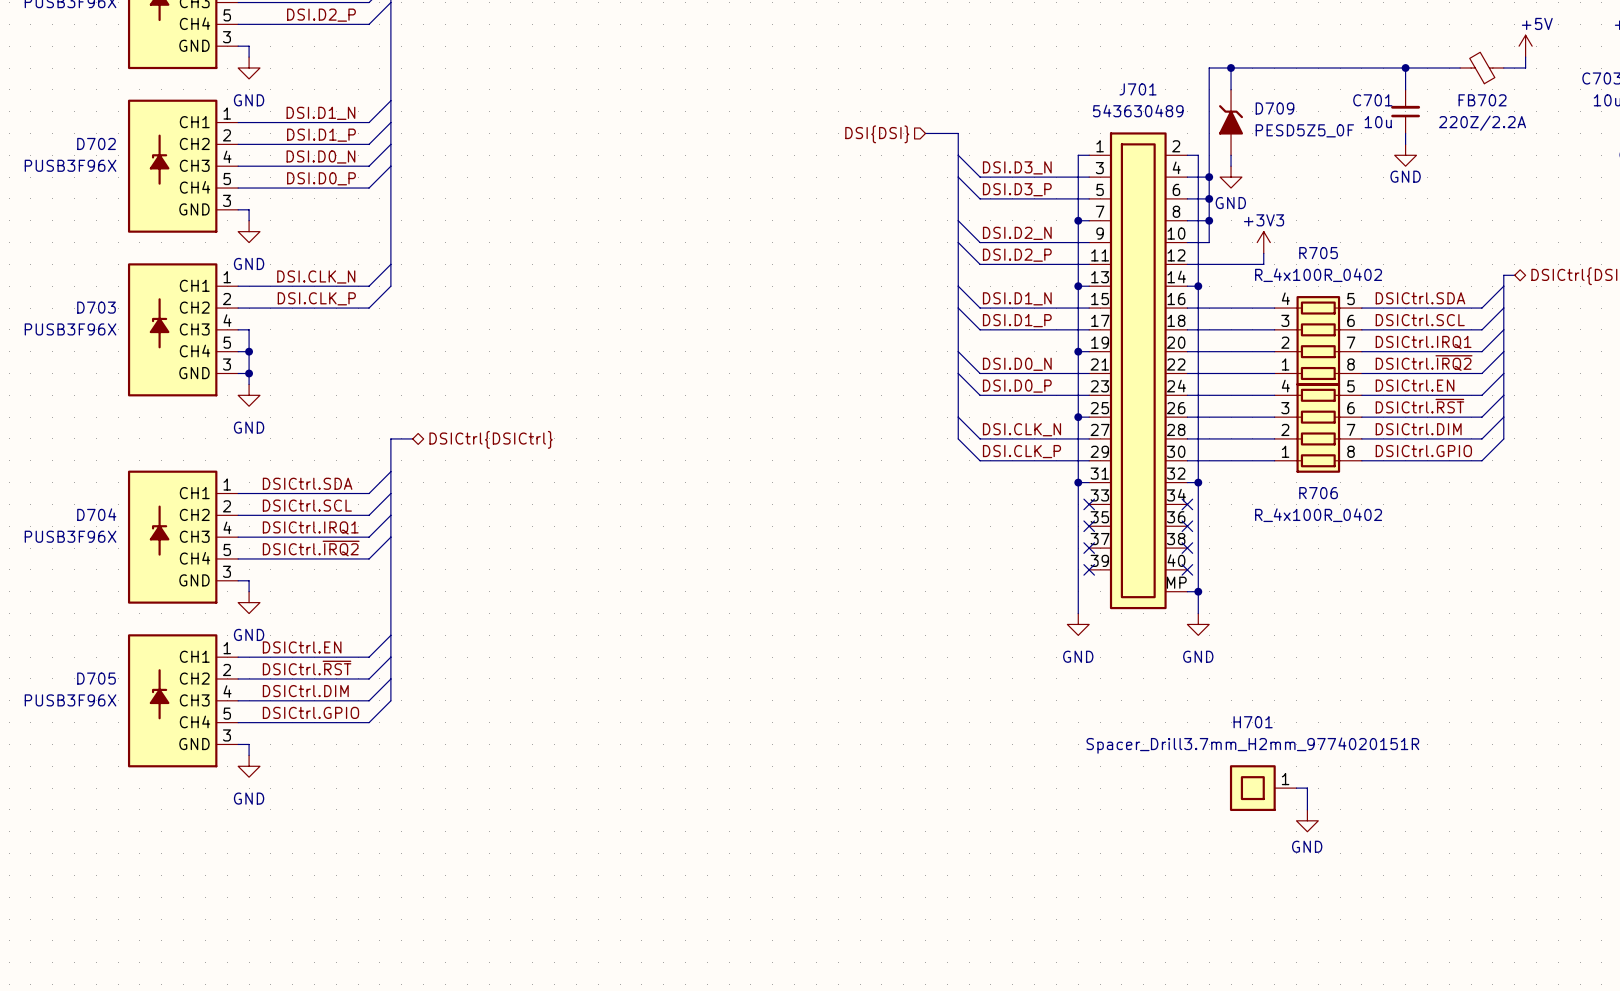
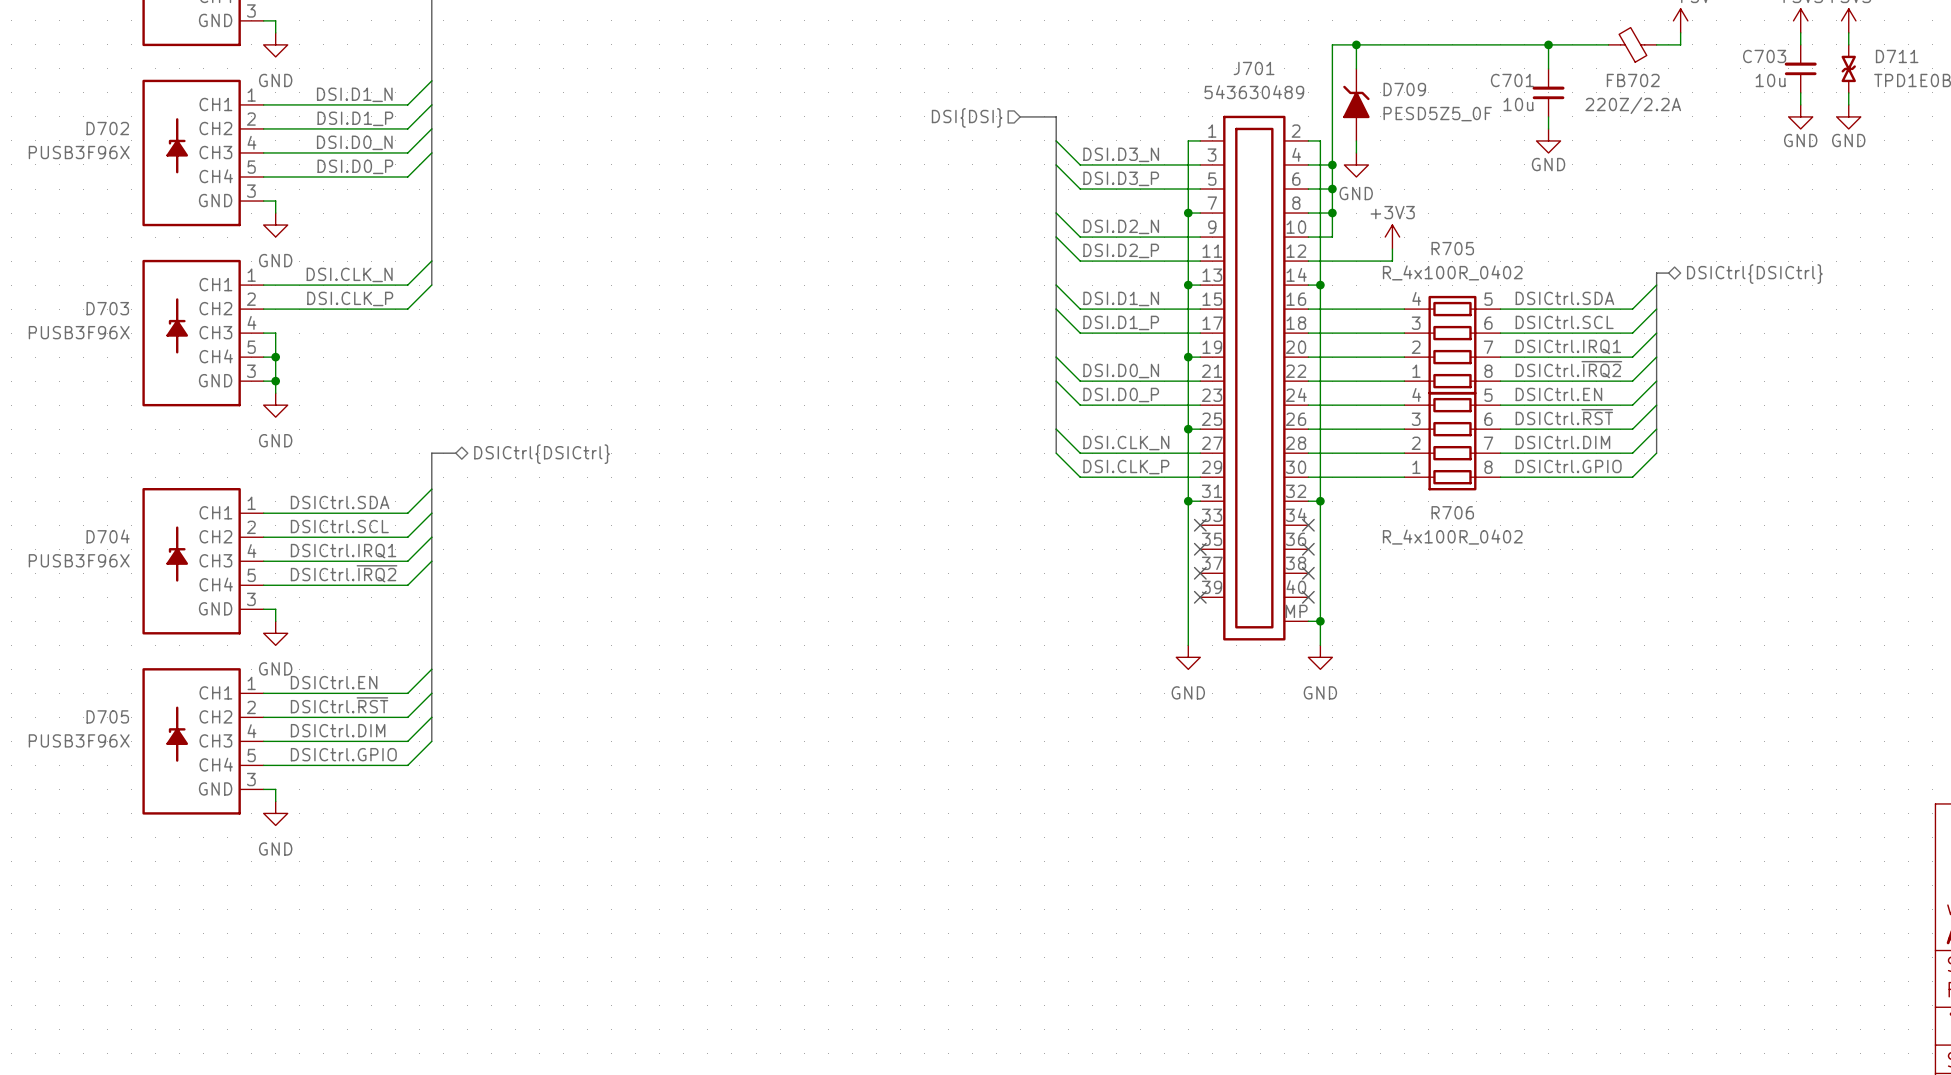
H701: Spacer_Drill3.7mm_H2mm_9774020151R (1263, 788) -> none
wire: (1296, 788) (1307, 788) (1307, 809) -> none
power symbol: GND (1307, 820) -> none

